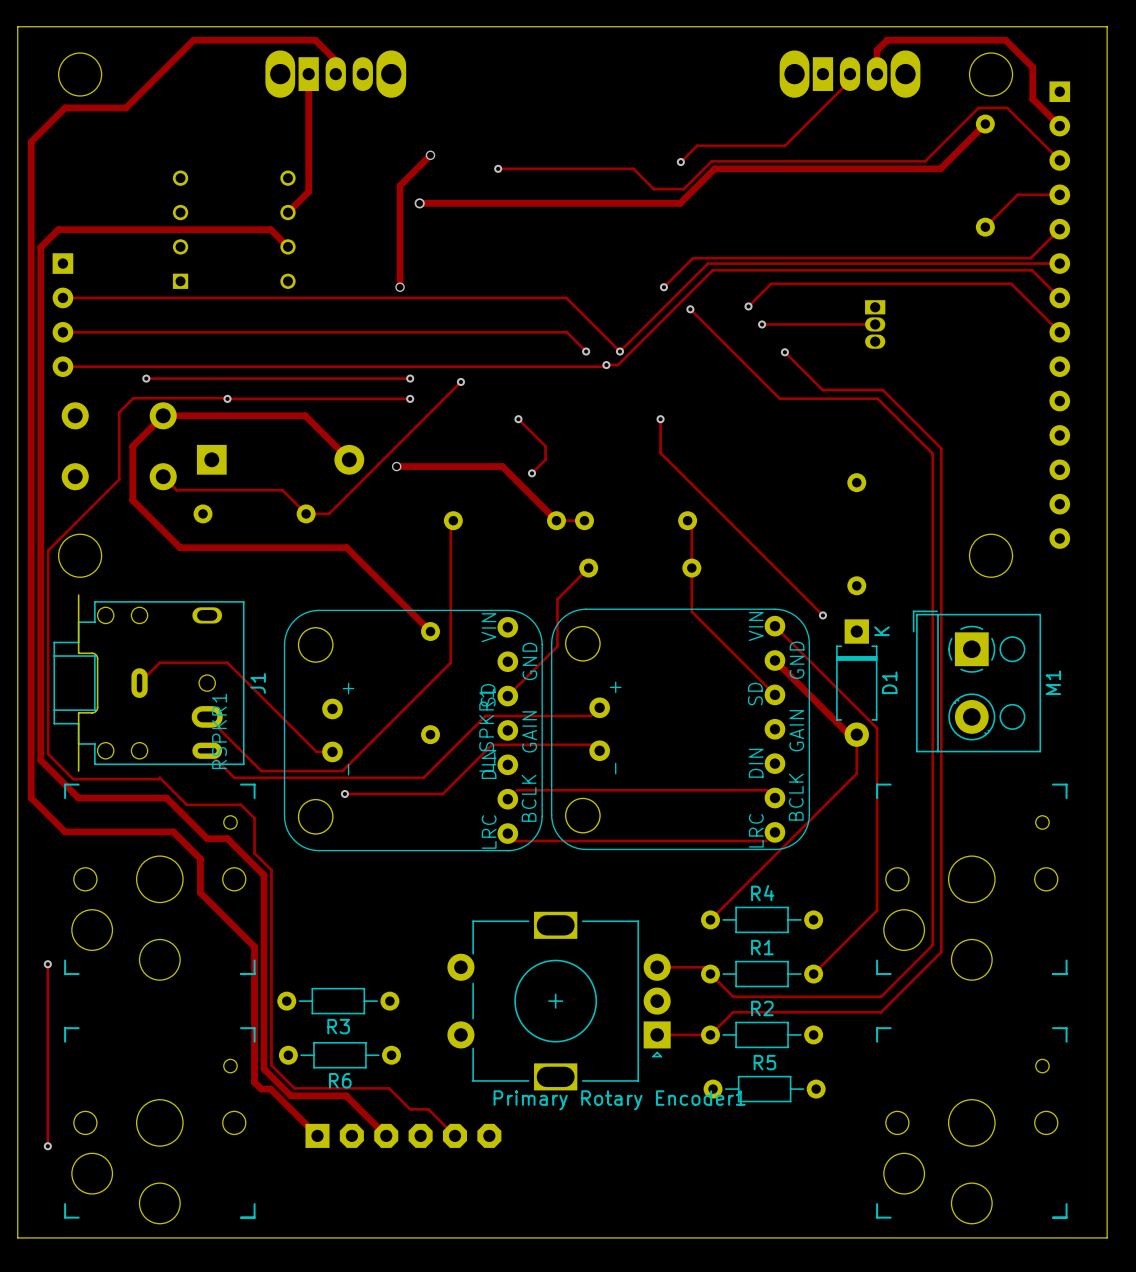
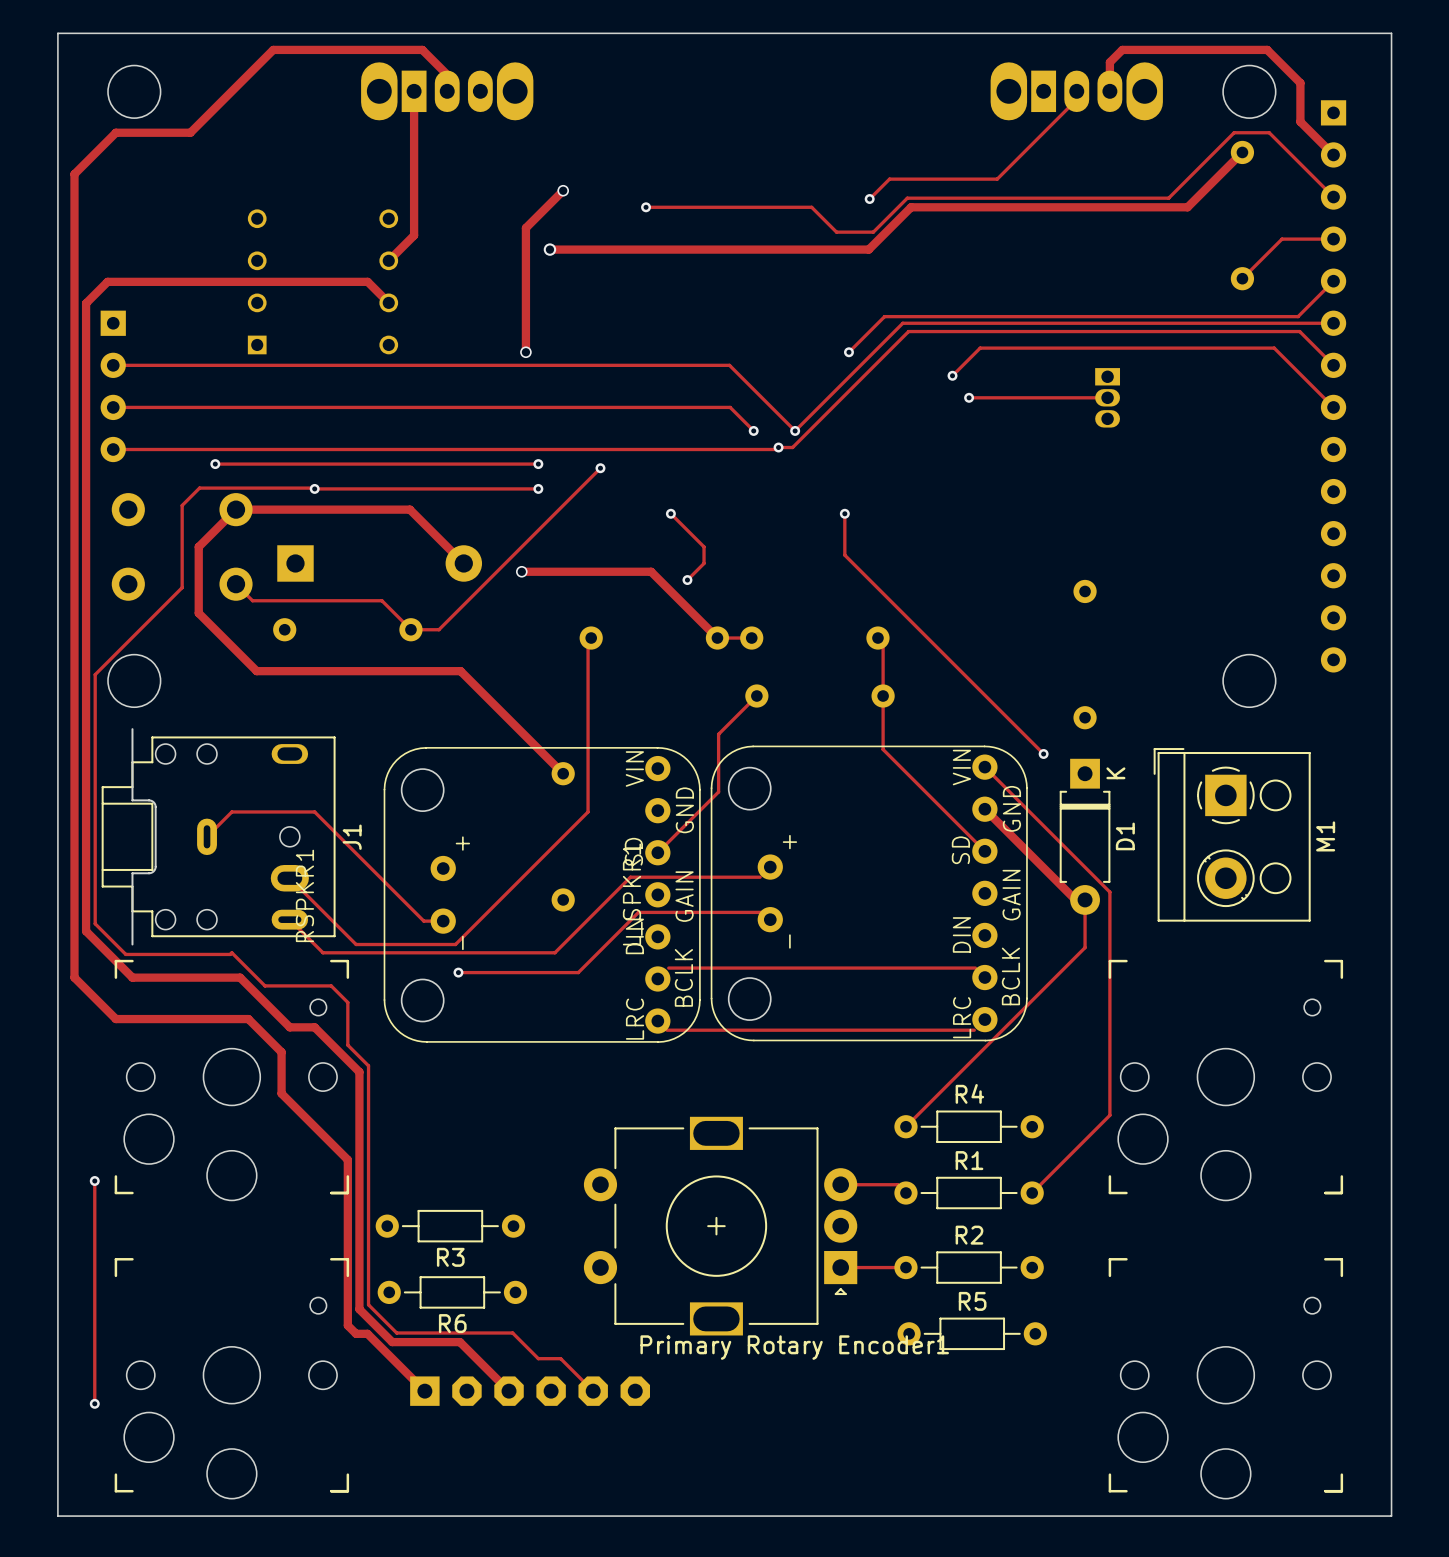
track: (688, 307) (779, 398) (877, 398) (932, 453) (932, 945) (881, 996) (733, 996) (710, 974) -> none
via: (690, 309) -> none
track: (784, 352) (822, 390) (882, 390) (941, 448) (941, 952) (881, 1012) (733, 1012) (710, 1034) -> none
via: (784, 352) -> none

